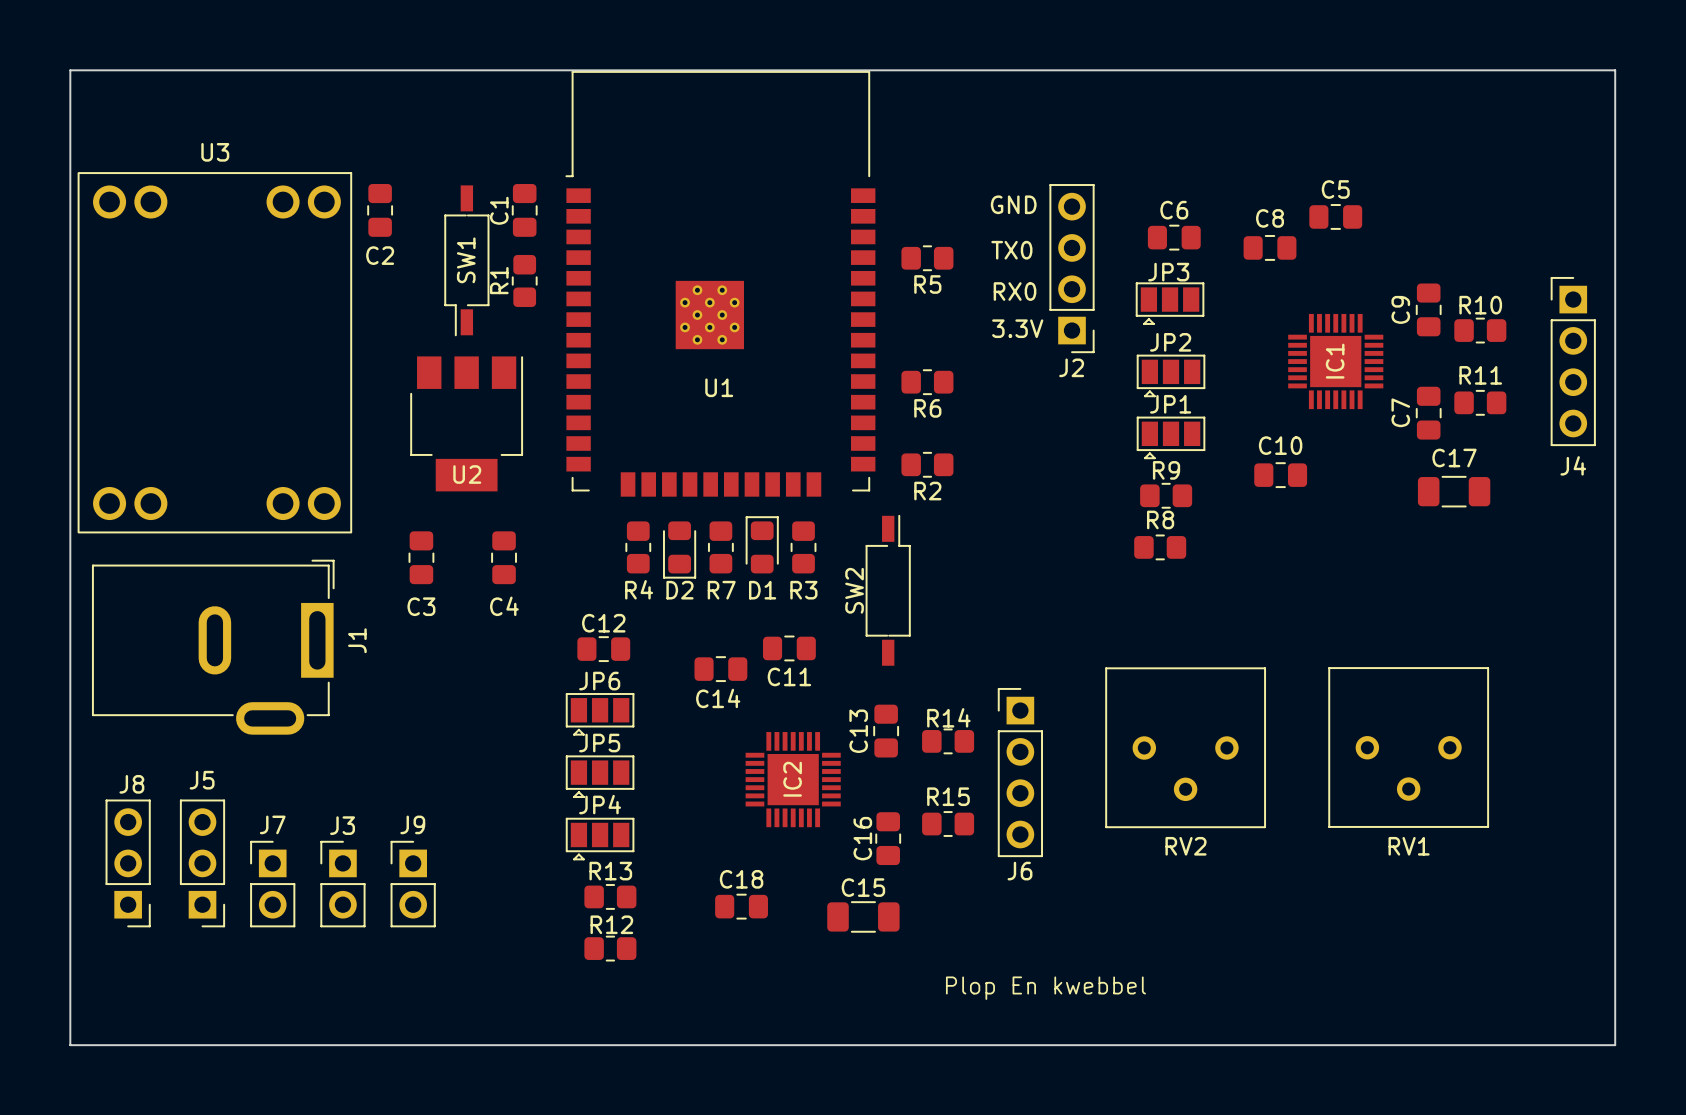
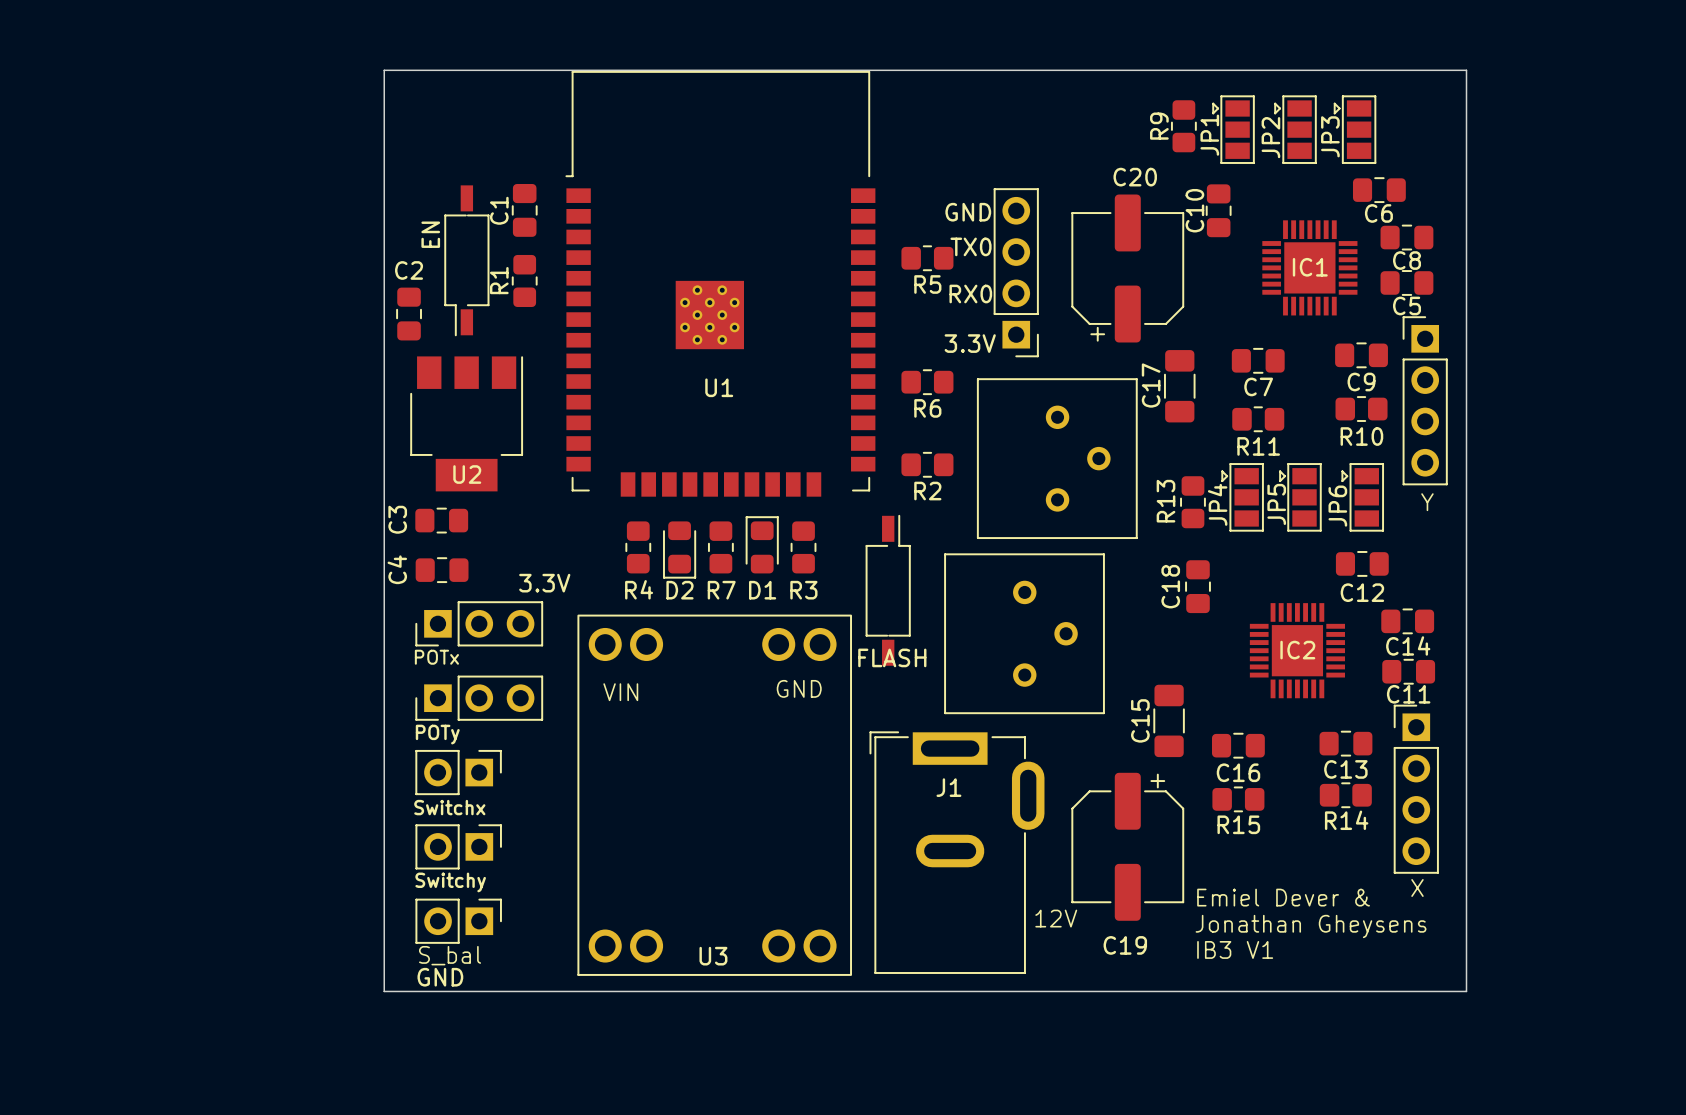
board edge: (384, 70) (70, 70) (70, 1045) (1615, 1045) (1615, 70) (1466, 70) -> (384, 70) (384, 991) (1466, 991) (1466, 70)
U3 name position: U3 (215, 152) -> U3 (713, 956)
C5 name position: C5 (1335, 189) -> C5 (1407, 305)
text position: GND (1013, 204) -> GND (968, 212)
C2 position: (380, 210) -> (409, 314)
C6 name position: C6 (1174, 210) -> C6 (1378, 213)
C5 position: (1335, 216) -> (1406, 282)
C8 name position: C8 (1270, 218) -> C8 (1407, 260)
SW1 value: none -> EN (430, 234)
C6 position: (1174, 237) -> (1379, 190)
C8 position: (1270, 247) -> (1406, 237)
text position: TX0 (1011, 250) -> TX0 (971, 246)
C2 name position: C2 (380, 255) -> C2 (409, 270)
SW1 name: SW1 (466, 260) -> none
J2: (1072, 268) -> none
C20: none -> (1127, 268)
part: none -> (1016, 272)
JP3 name position: JP3 (1168, 272) -> JP3 (1330, 136)
text position: RX0 (1015, 291) -> RX0 (970, 293)
JP3 rotation: 0° (1170, 303) -> 90° clockwise (1355, 129)
JP3 position: (1170, 303) -> (1355, 129)
R10 name position: R10 (1480, 305) -> R10 (1361, 436)
C9 name position: C9 (1400, 309) -> C9 (1361, 381)
C9 rotation: 0° (1428, 309) -> 90° clockwise (1361, 355)
C9 position: (1428, 309) -> (1361, 355)
text position: 3.3V (1017, 328) -> 3.3V (970, 343)
R10 position: (1480, 330) -> (1361, 409)
JP2 name position: JP2 (1170, 342) -> JP2 (1270, 137)
U3 rotation: 0° (214, 352) -> 180° (714, 795)
U3 position: (214, 352) -> (714, 795)
IC1 position: (1335, 361) -> (1309, 267)
IC1 name rotation: 0° (1335, 361) -> 90° clockwise (1310, 267)
J4: (1573, 361) -> none
JP2 rotation: 0° (1171, 375) -> 90° clockwise (1295, 129)
JP2 position: (1171, 375) -> (1295, 129)
R11 name position: R11 (1480, 375) -> R11 (1258, 446)
part: none -> (1425, 400)
R11 position: (1480, 402) -> (1258, 419)
JP1 name position: JP1 (1170, 404) -> JP1 (1209, 135)
C7 name position: C7 (1400, 412) -> C7 (1258, 386)
C7 rotation: 0° (1428, 413) -> 90° clockwise (1258, 360)
C7 position: (1428, 413) -> (1258, 360)
JP1 rotation: 0° (1171, 437) -> 90° clockwise (1233, 129)
JP1 position: (1171, 437) -> (1233, 129)
C10 name position: C10 (1280, 445) -> C10 (1194, 210)
part: none -> (1057, 458)
C17 name position: C17 (1454, 458) -> C17 (1151, 385)
R9 name position: R9 (1166, 470) -> R9 (1159, 126)
C10 rotation: 0° (1280, 475) -> 90° clockwise (1218, 210)
C10 position: (1280, 475) -> (1218, 210)
C17 rotation: 0° (1454, 491) -> 90° clockwise (1179, 386)
C17 position: (1454, 491) -> (1179, 386)
R9 rotation: 0° (1166, 495) -> 90° clockwise (1183, 126)
R9 position: (1166, 495) -> (1183, 126)
text: none -> Y (1427, 502)
R8: (1160, 547) -> none
C3 rotation: 0° (421, 557) -> 90° clockwise (441, 520)
C3 position: (421, 557) -> (441, 520)
C4 rotation: 0° (504, 557) -> 90° clockwise (442, 570)
C4 position: (504, 557) -> (442, 570)
text: none -> 3.3V (544, 583)
SW2 name: SW2 (854, 590) -> none
part: none -> POTx (479, 623)
C12 name position: C12 (603, 623) -> C12 (1362, 592)
part: none -> (1024, 633)
J1 name position: J1 (357, 640) -> J1 (948, 787)
J1 rotation: 0° (213, 647) -> 90° counterclockwise (956, 852)
J1 position: (213, 647) -> (956, 852)
C11 position: (789, 648) -> (1408, 671)
C12 position: (603, 649) -> (1362, 563)
SW2 value: none -> FLASH (892, 657)
C14 position: (720, 669) -> (1407, 621)
C11 name position: C11 (789, 676) -> C11 (1408, 694)
JP6 name position: JP6 (599, 681) -> JP6 (1337, 506)
text: none -> GND (799, 688)
text: none -> VIN (620, 692)
part: none -> POTy (479, 698)
C14 name position: C14 (718, 698) -> C14 (1408, 645)
JP6 rotation: 0° (600, 714) -> 90° clockwise (1362, 497)
JP6 position: (600, 714) -> (1362, 497)
R14 name position: R14 (948, 717) -> R14 (1346, 820)
C13 name position: C13 (858, 731) -> C13 (1345, 769)
C13 rotation: 0° (886, 731) -> 90° clockwise (1345, 743)
C13 position: (886, 731) -> (1345, 743)
R14 position: (948, 741) -> (1345, 795)
JP5 name position: JP5 (599, 743) -> JP5 (1276, 504)
RV2: (1185, 747) -> none
RV1: (1408, 747) -> none
part: none -> Switchx (458, 772)
J6: (1020, 772) -> none
JP5 rotation: 0° (600, 776) -> 90° clockwise (1300, 497)
JP5 position: (600, 776) -> (1300, 497)
IC2 name rotation: 0° (792, 779) -> 90° clockwise (1297, 650)
IC2 position: (793, 779) -> (1297, 650)
part: none -> (1416, 789)
R15 name position: R15 (948, 796) -> R15 (1238, 824)
JP4 name position: JP4 (600, 804) -> JP4 (1217, 504)
R15 position: (948, 824) -> (1238, 799)
C16 name position: C16 (862, 838) -> C16 (1238, 772)
C16 rotation: 0° (888, 838) -> 90° clockwise (1238, 745)
C16 position: (888, 838) -> (1238, 745)
JP4 rotation: 0° (600, 839) -> 90° clockwise (1242, 497)
JP4 position: (600, 839) -> (1242, 497)
part: none -> Switchy (458, 846)
C19: none -> (1127, 846)
J8: (128, 863) -> none
J5: (202, 863) -> none
R13 name position: R13 (610, 871) -> R13 (1166, 501)
C18 name position: C18 (741, 879) -> C18 (1170, 586)
J7: (272, 884) -> none
J3: (342, 884) -> none
J9: (413, 884) -> none
C15 name position: C15 (863, 887) -> C15 (1140, 720)
text: none -> X (1417, 887)
R13 rotation: 0° (610, 896) -> 90° clockwise (1192, 502)
R13 position: (610, 896) -> (1192, 502)
text: none -> Emiel Dever & (1283, 897)
C18 rotation: 0° (741, 906) -> 90° clockwise (1198, 586)
C18 position: (741, 906) -> (1198, 586)
C15 rotation: 0° (863, 916) -> 90° clockwise (1169, 720)
C15 position: (863, 916) -> (1169, 720)
text: none -> 12V (1056, 918)
part: none -> (458, 921)
text: none -> Jonathan Gheysens (1311, 926)
R12: (610, 948) -> none
text: none -> IB3 V1 (1235, 949)
text: none -> S_bal (450, 955)
text: none -> GND (440, 977)
text: Plop En kwebbel (1045, 988) -> none

